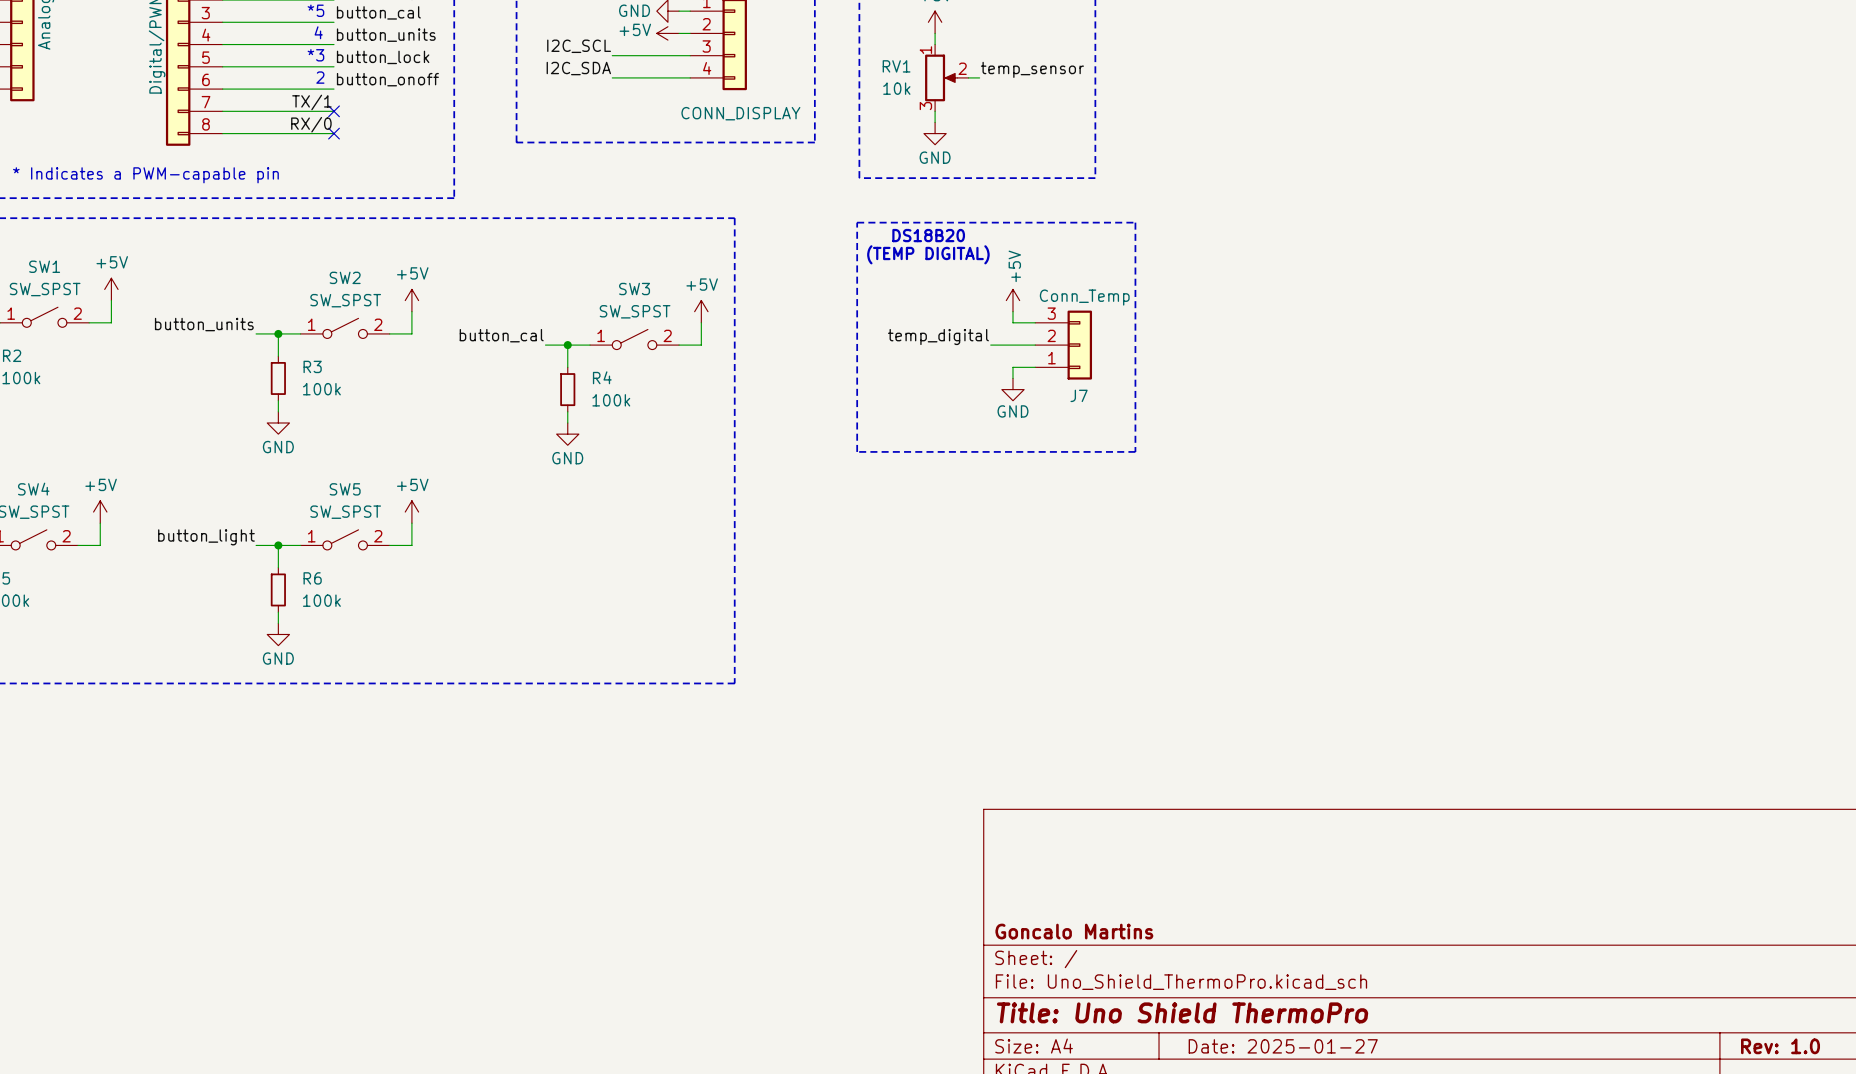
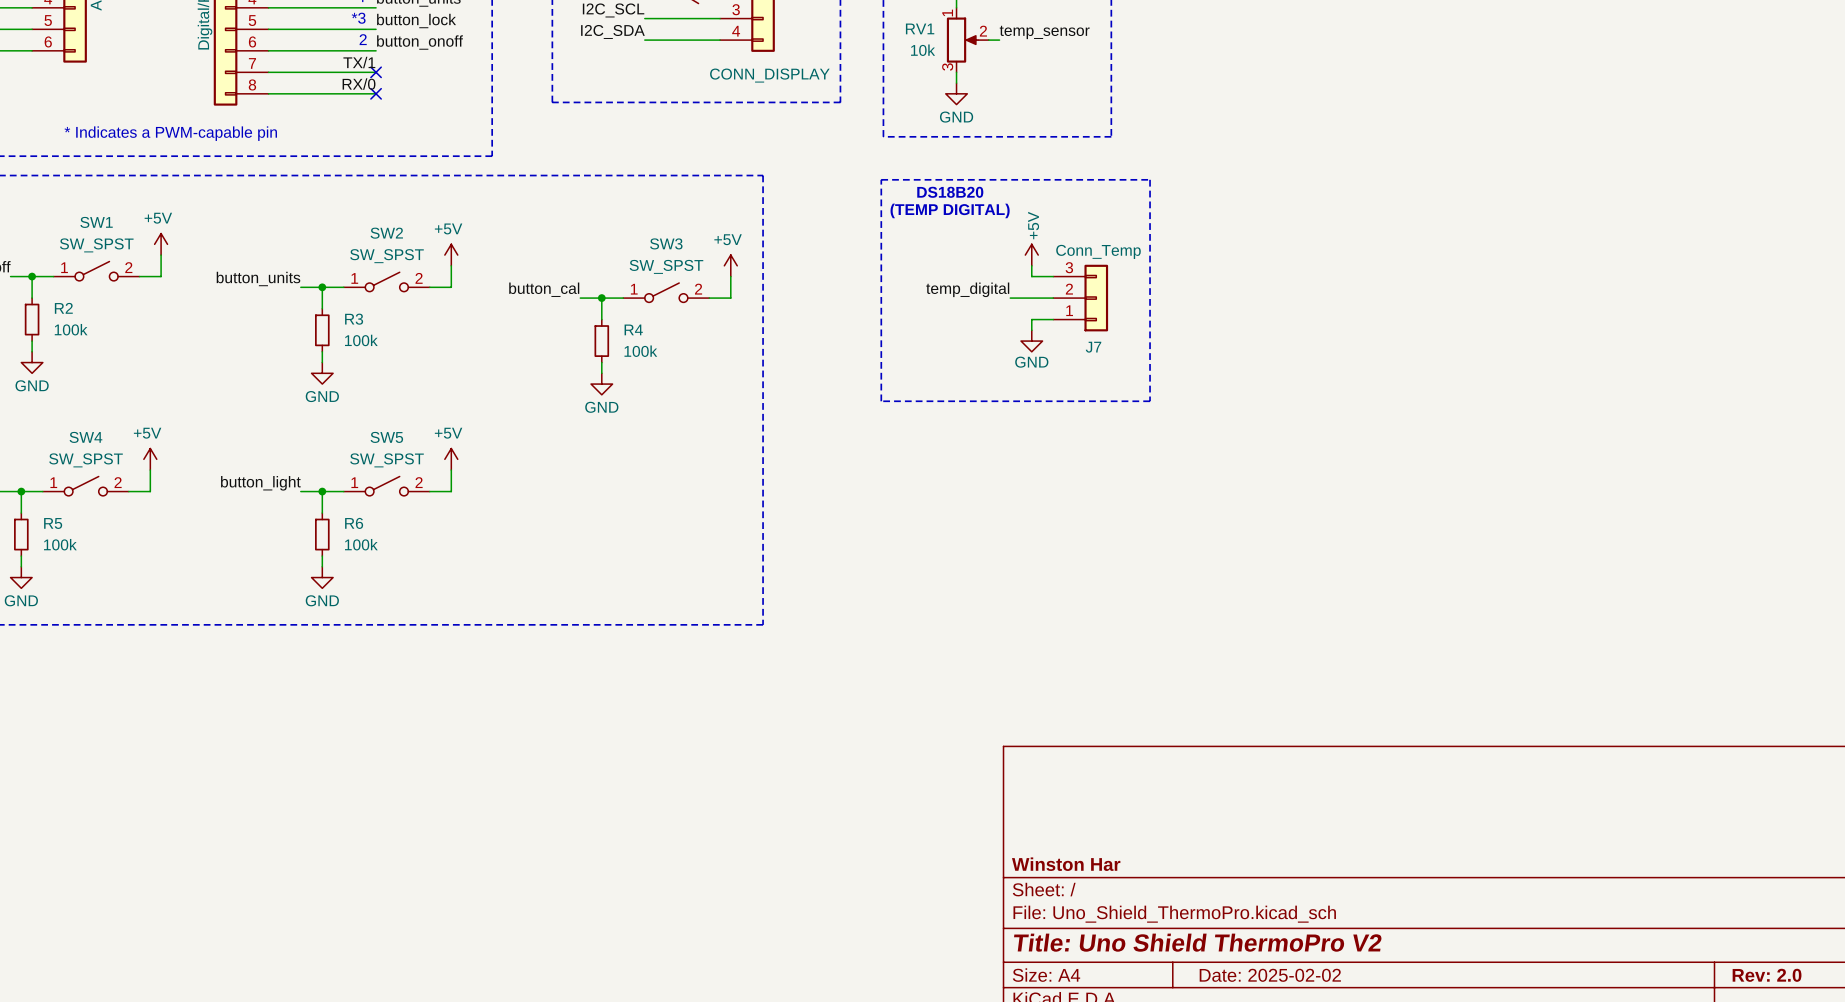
title block: Goncalo Martins (1074, 931) -> Winston Har (1066, 864)
title block: Title: Uno Shield ThermoPro (1182, 1012) -> Title: Uno Shield ThermoPro V2 (1197, 942)
title block: Date: 2025-01-27 (1283, 1046) -> Date: 2025-02-02 (1270, 975)
title block: Rev: 1.0 (1780, 1046) -> Rev: 2.0 (1767, 975)

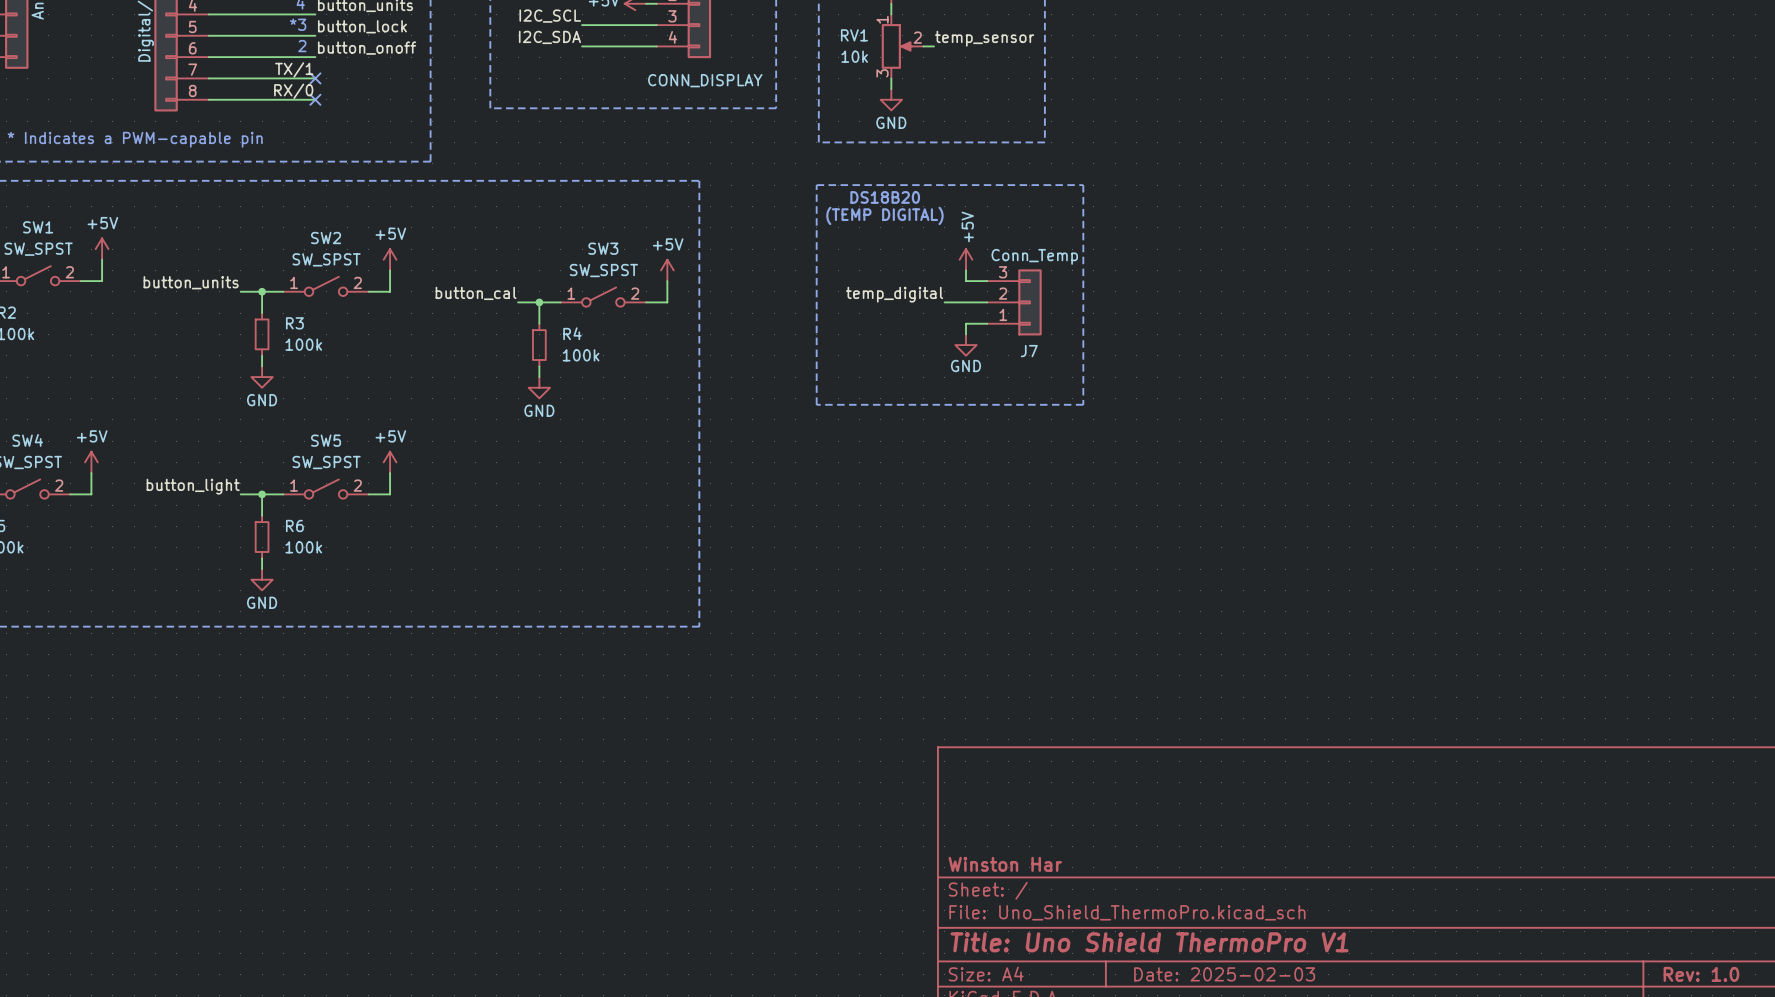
title block: Title: Uno Shield ThermoPro V2 (1197, 942) -> Title: Uno Shield ThermoPro V1 (1149, 942)
title block: Date: 2025-02-02 (1270, 975) -> Date: 2025-02-03 (1224, 974)
title block: Rev: 2.0 (1767, 975) -> Rev: 1.0 (1701, 974)

